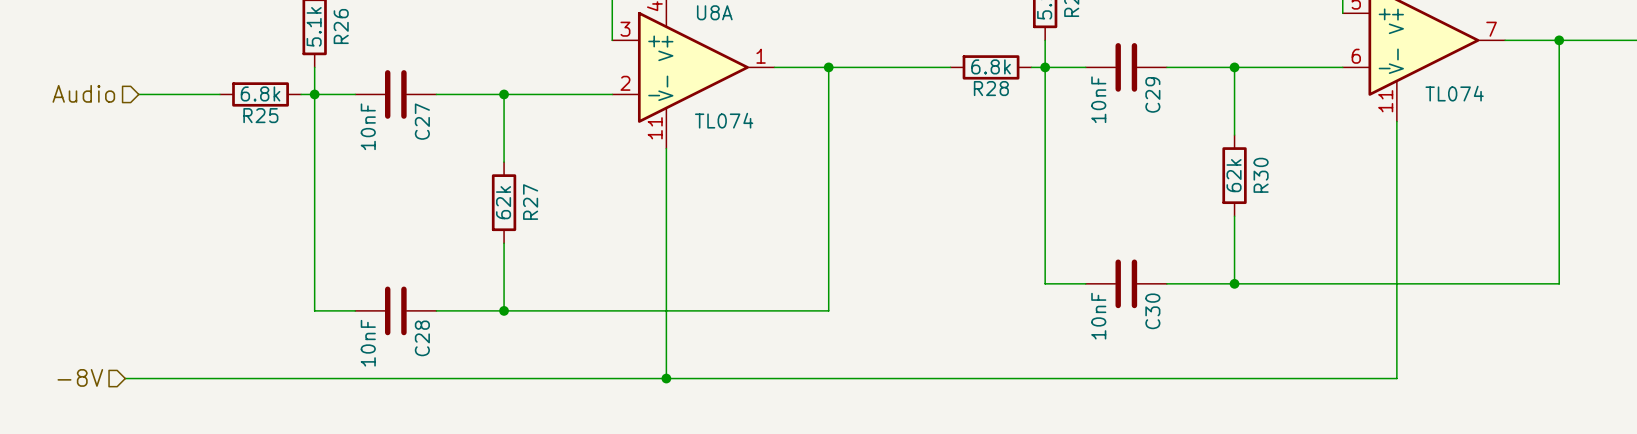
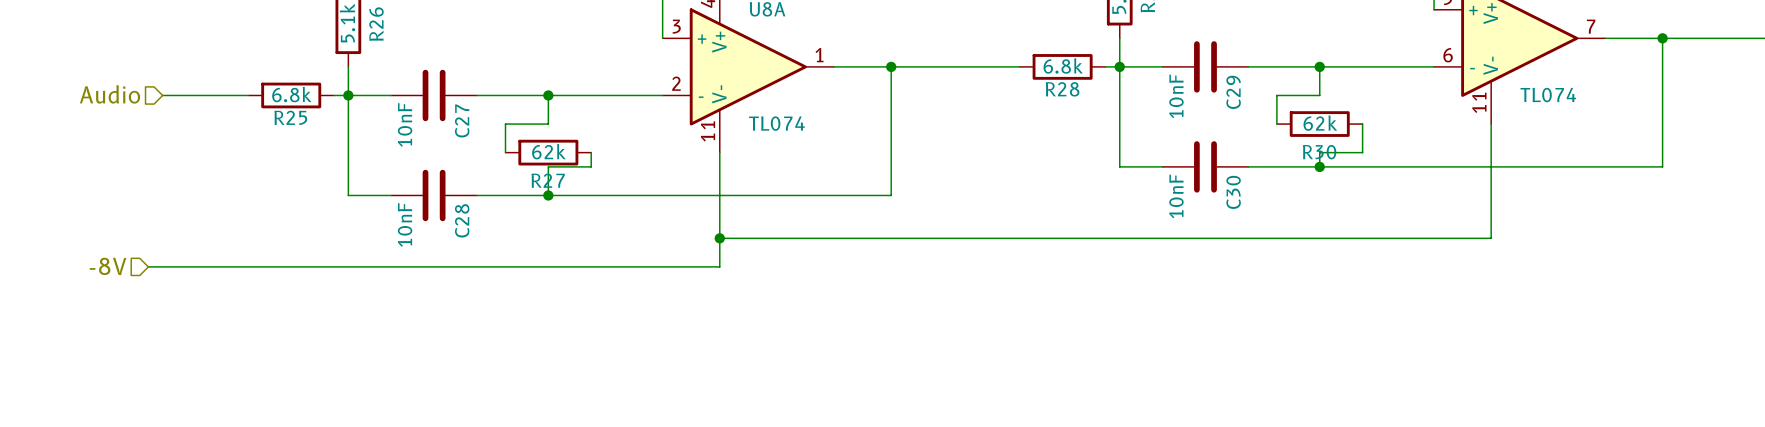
wire: (1234, 94) (1234, 135) -> (1319, 95) (1276, 95) (1276, 124)
wire: (504, 121) (504, 162) -> (548, 124) (505, 124) (505, 152)
wire: none -> (1362, 124) (1362, 152) (1319, 152) (1319, 166)
wire: none -> (591, 152) (591, 166) (548, 166) (548, 195)
wire: (1045, 162) (1045, 283) (1085, 283) -> (1119, 166) (1162, 166)
junction: none -> (1319, 166)
wire: (1559, 162) (1559, 283) (1166, 283) -> (1662, 166) (1248, 166)
R30 rotation: 0° (1234, 175) -> 90° clockwise (1319, 124)
R30 position: (1234, 175) -> (1319, 124)
wire: (314, 189) (314, 310) (355, 310) -> (348, 195) (391, 195)
junction: none -> (548, 195)
wire: (828, 189) (828, 310) (436, 310) -> (891, 195) (476, 195)
R27 rotation: 0° (504, 202) -> 90° clockwise (548, 152)
R27 position: (504, 202) -> (548, 152)
wire: (1234, 216) (1234, 283) -> none
junction: none -> (719, 238)
wire: (1396, 229) (1396, 378) (125, 378) -> (1491, 238) (719, 238)
wire: (504, 243) (504, 310) -> none
wire: (666, 256) (666, 378) -> (719, 266) (148, 266)
C30 position: (1126, 283) -> (1205, 166)
junction: (1234, 283) -> none
C28 position: (395, 310) -> (434, 195)
junction: (504, 310) -> none
hierarchical label position: -8V (80, 377) -> -8V (108, 266)
junction: (666, 378) -> none

